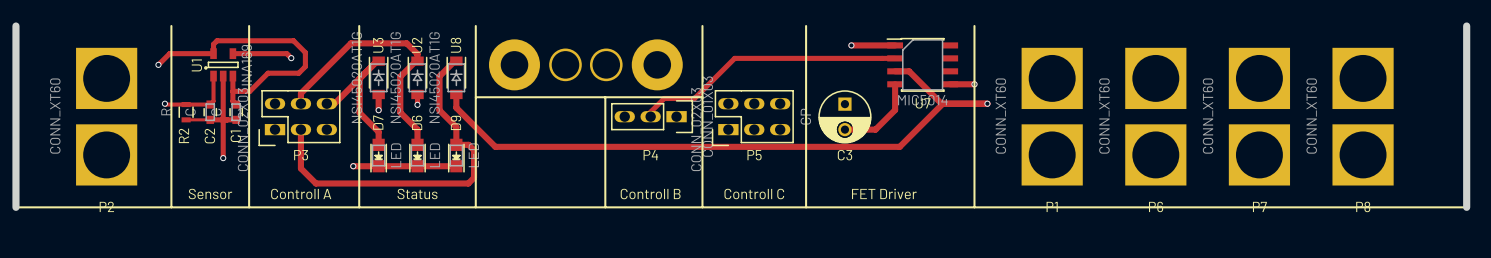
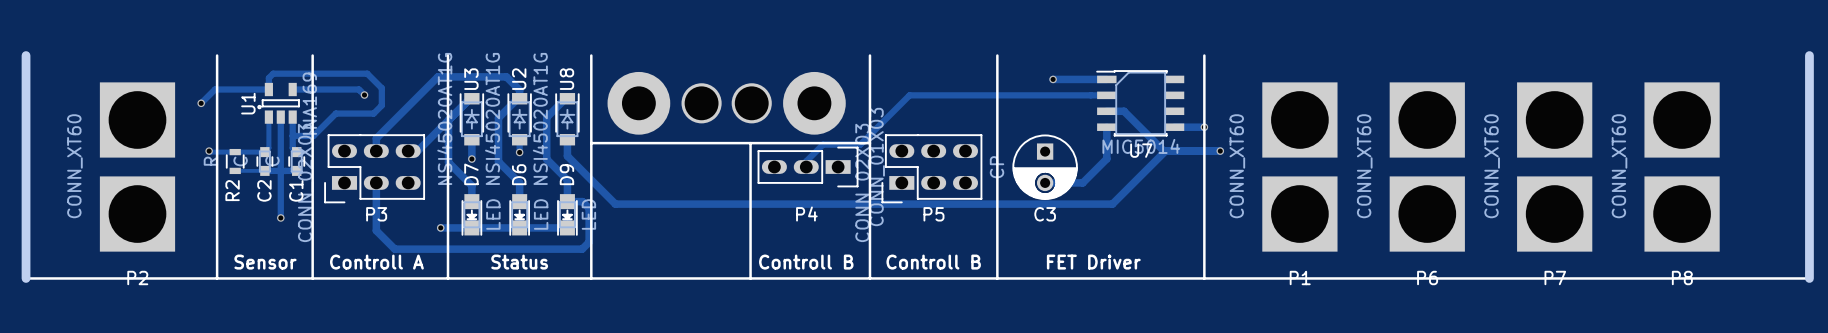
text: Controll C (754, 194) -> Controll B (933, 262)

